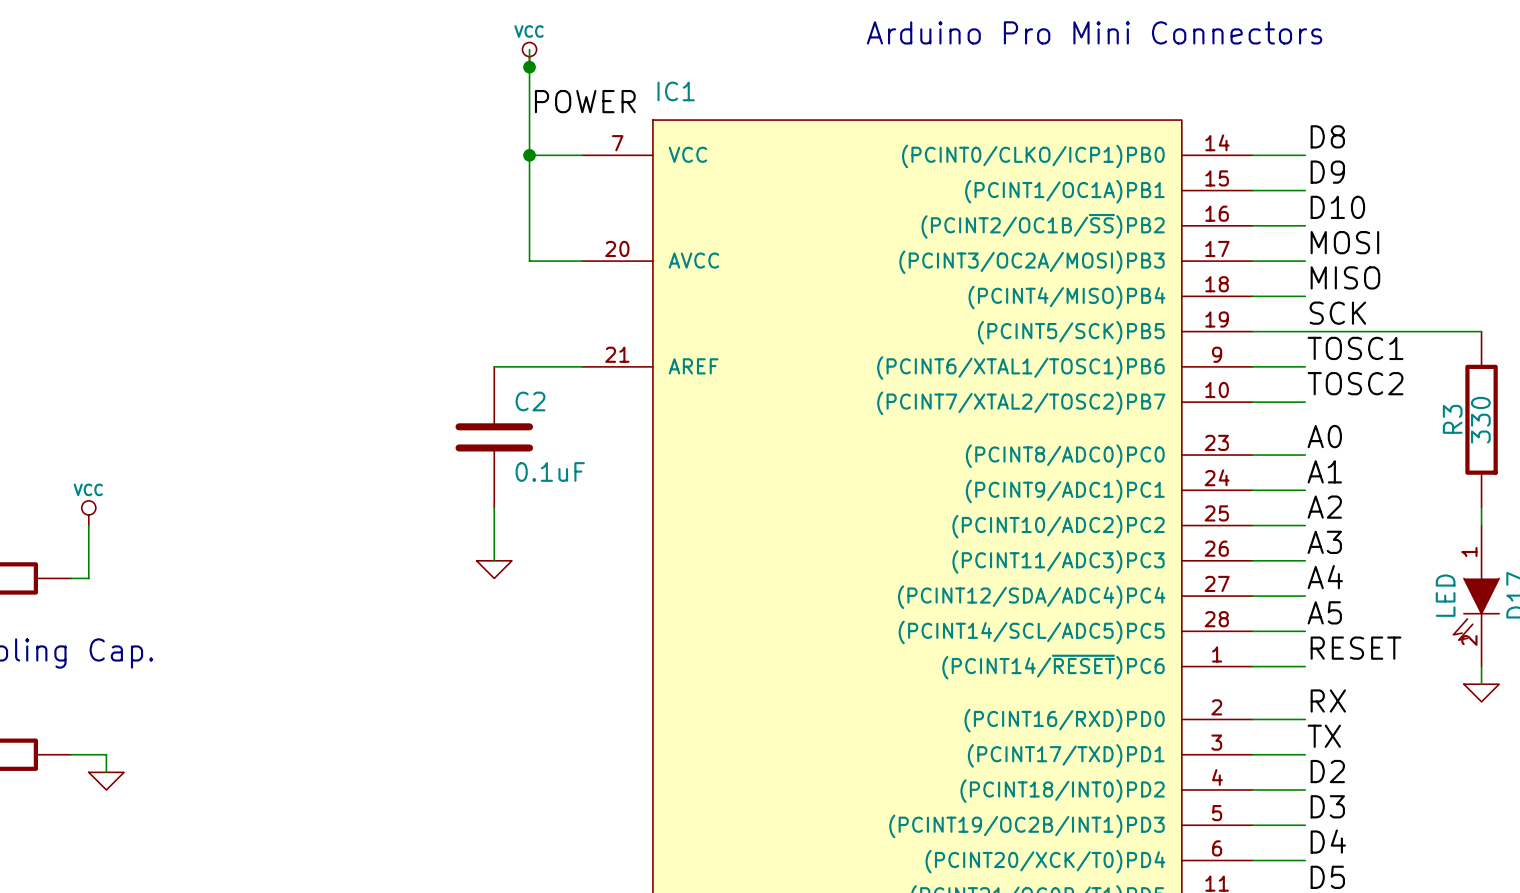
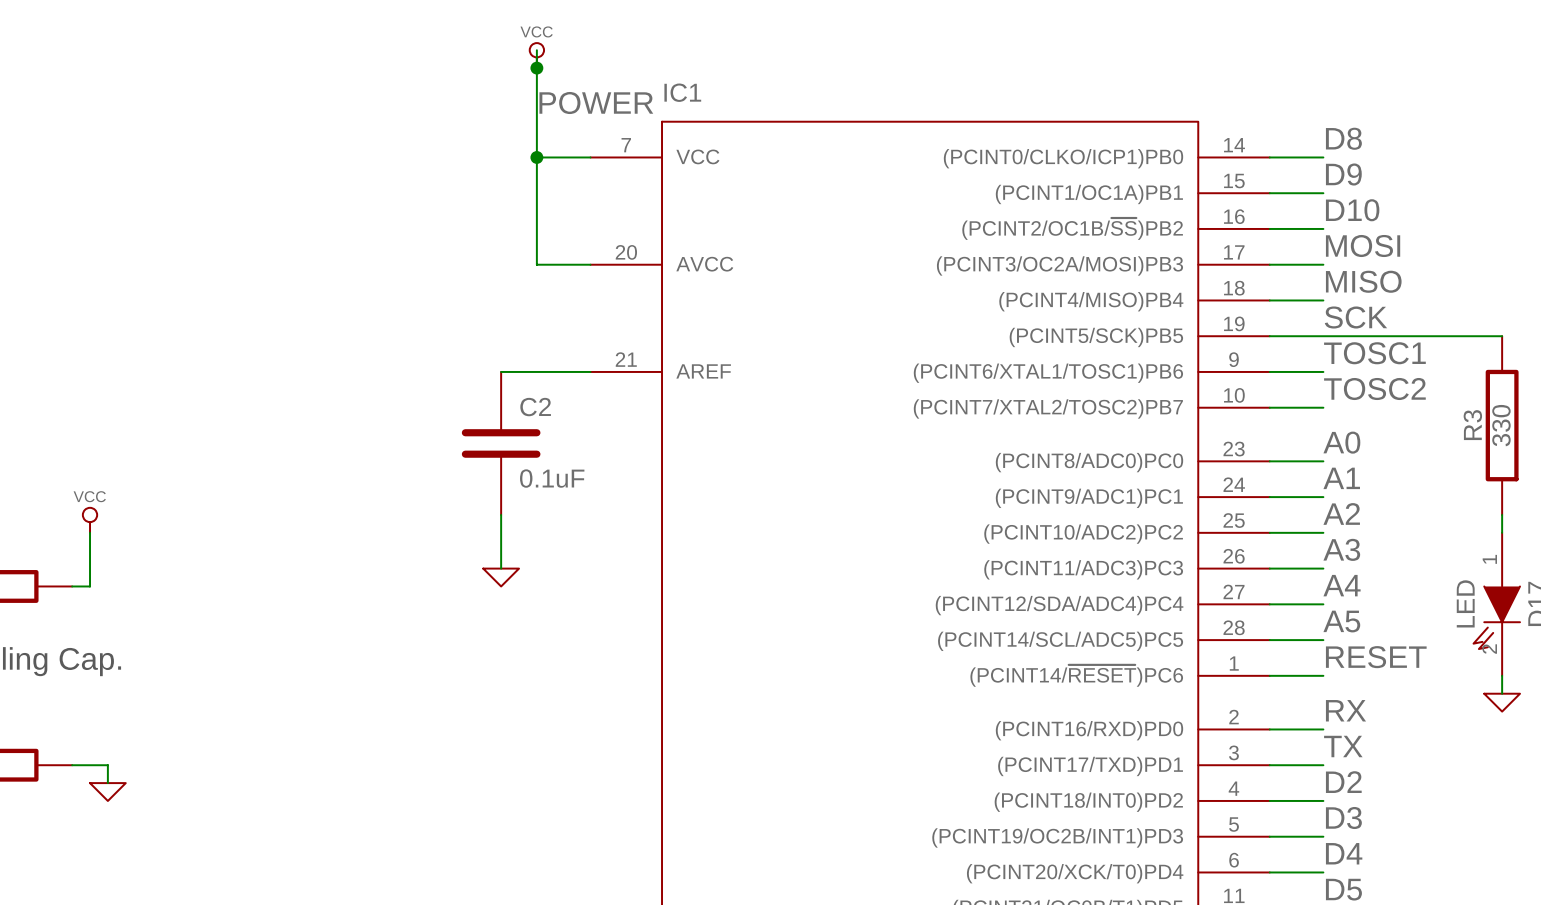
text: Arduino Pro Mini Connectors (1094, 32) -> none

